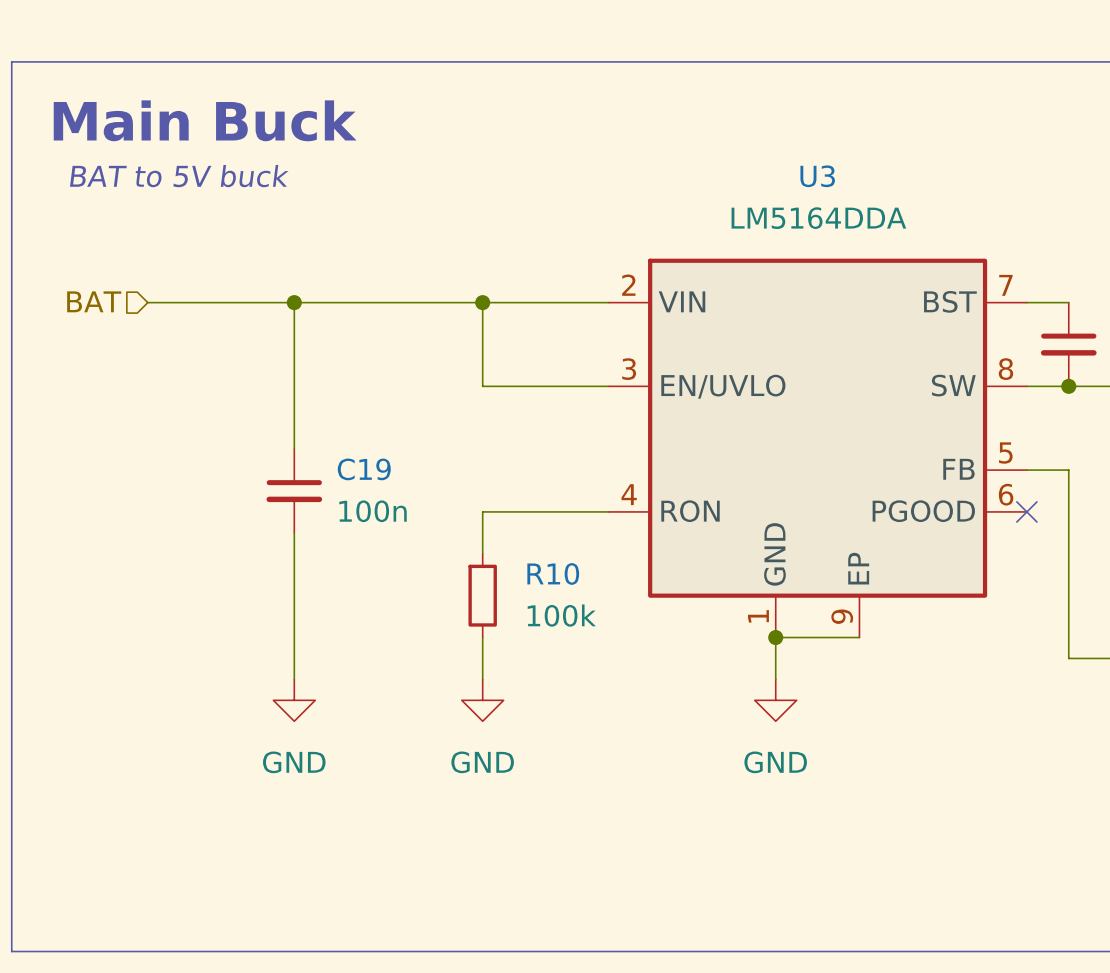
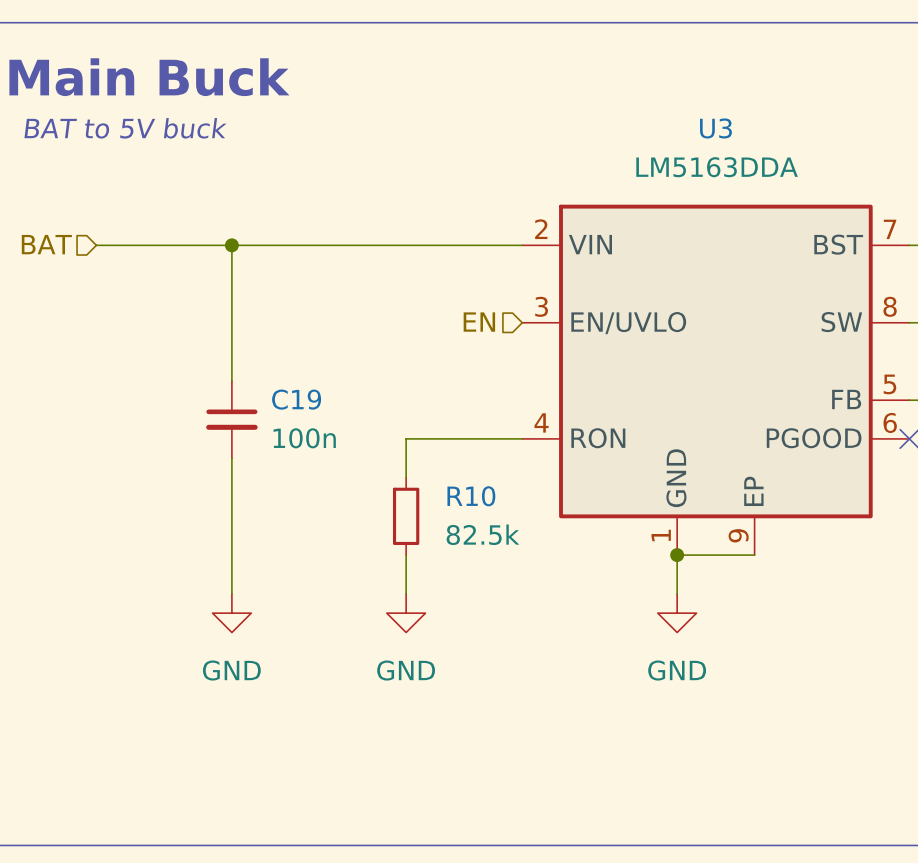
U3 value: LM5164DDA (818, 218) -> LM5163DDA (717, 167)
wire: (482, 302) (482, 386) (608, 386) -> none
junction: (482, 302) -> none
hierarchical label: none -> EN (479, 322)
R10 value: 100k (561, 615) -> 82.5k (482, 534)

